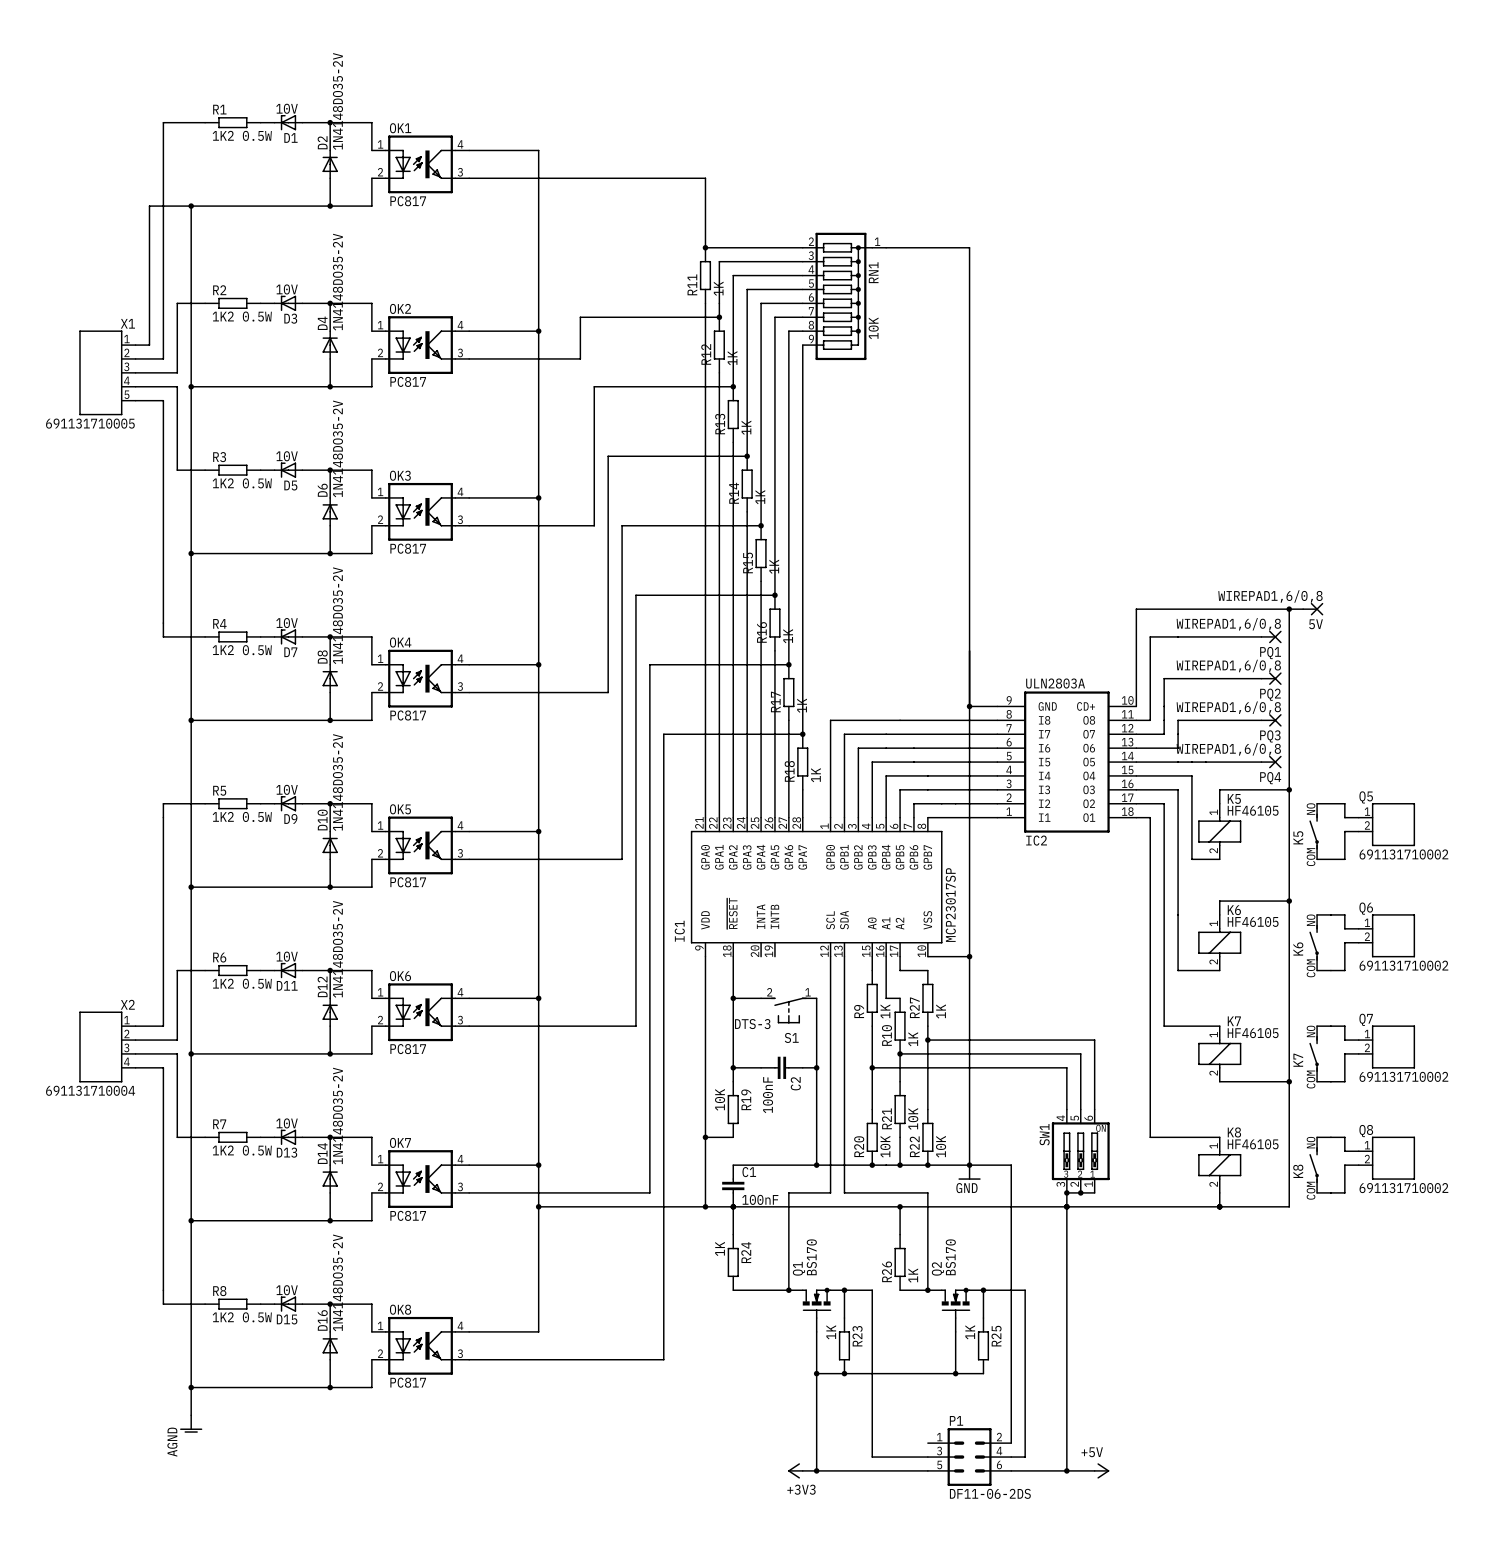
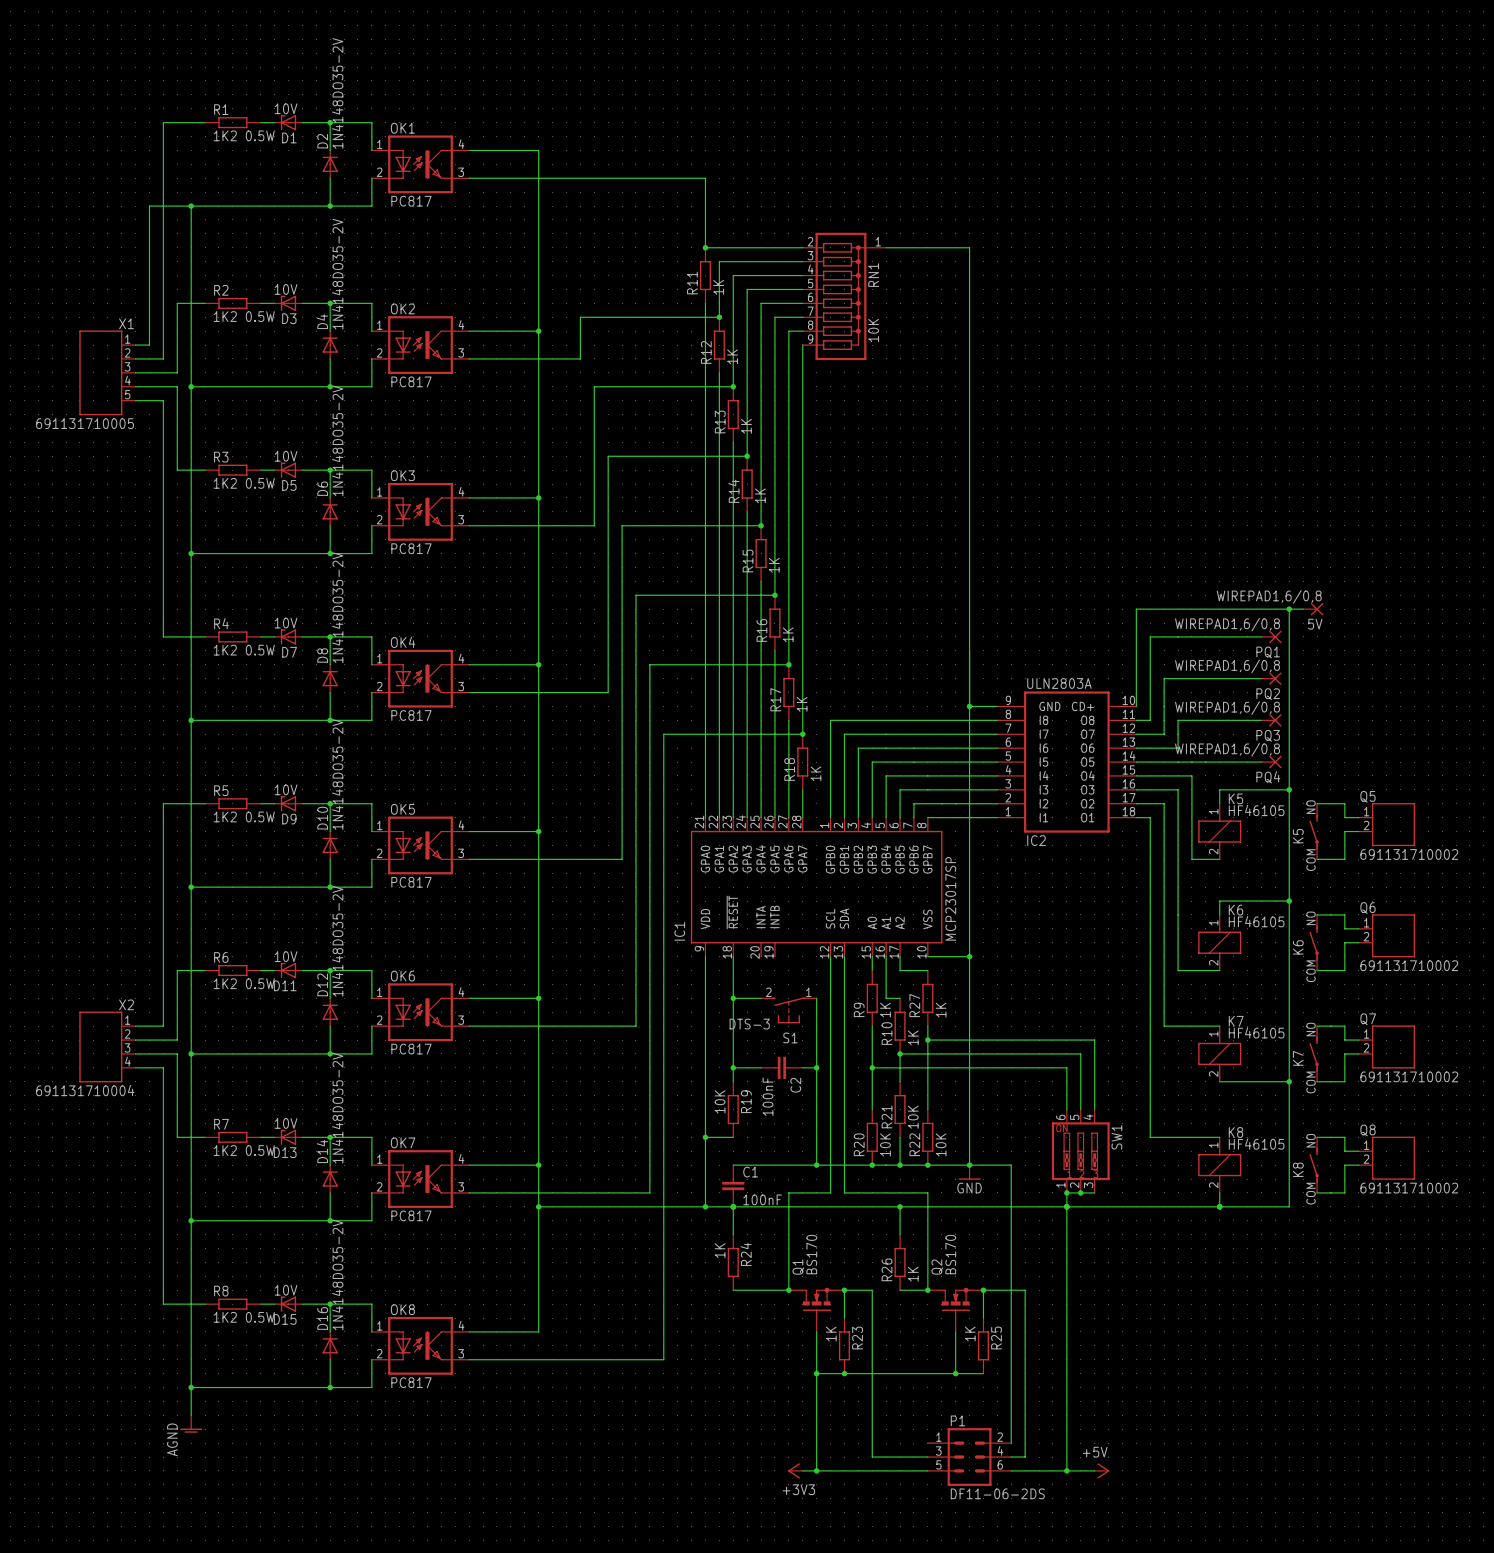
SW1 flip: as is (1080, 1151) -> left-right (1080, 1151)

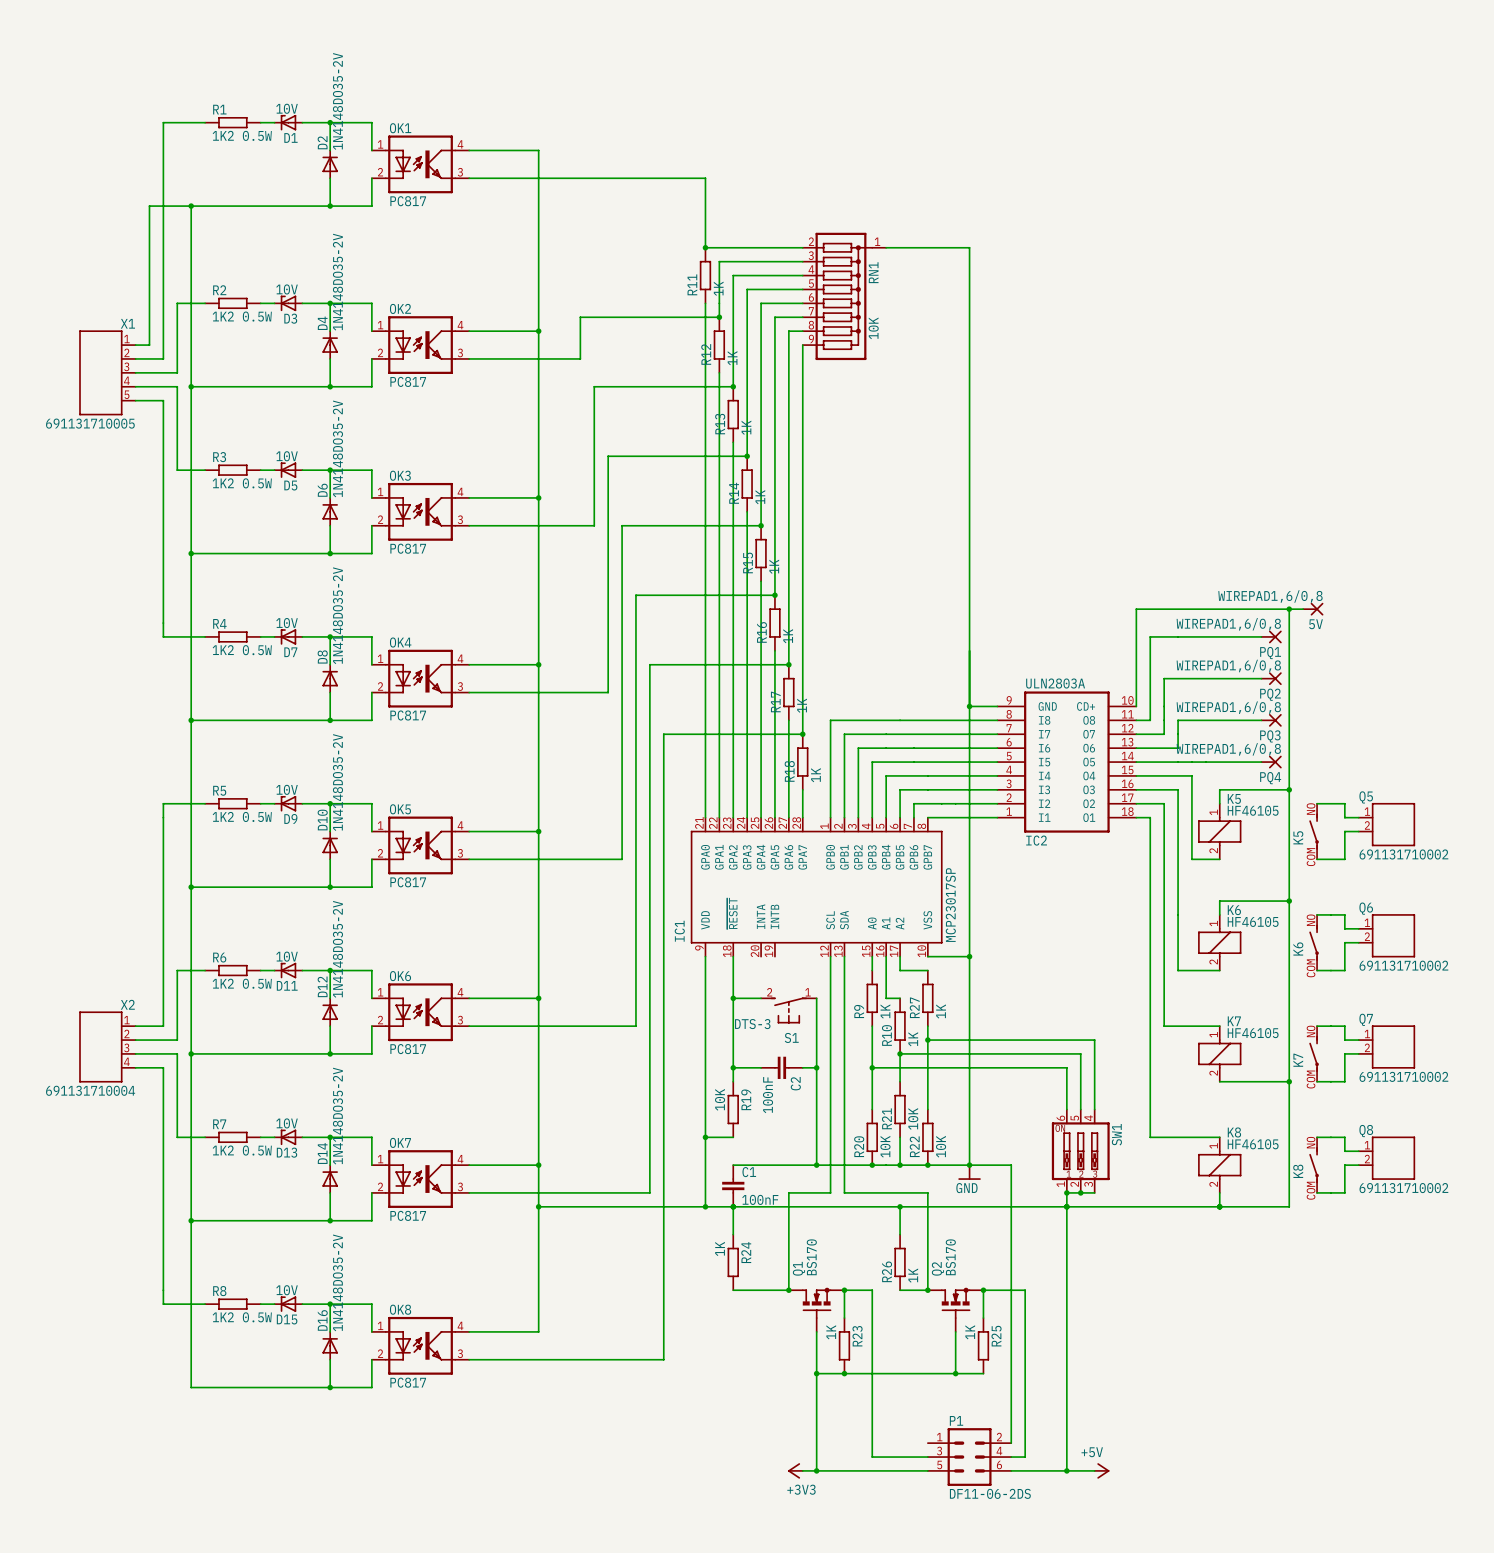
wire: (191, 1387) (191, 1415) -> none
junction: (191, 1387) -> none
power symbol: AGND (191, 1424) -> none

